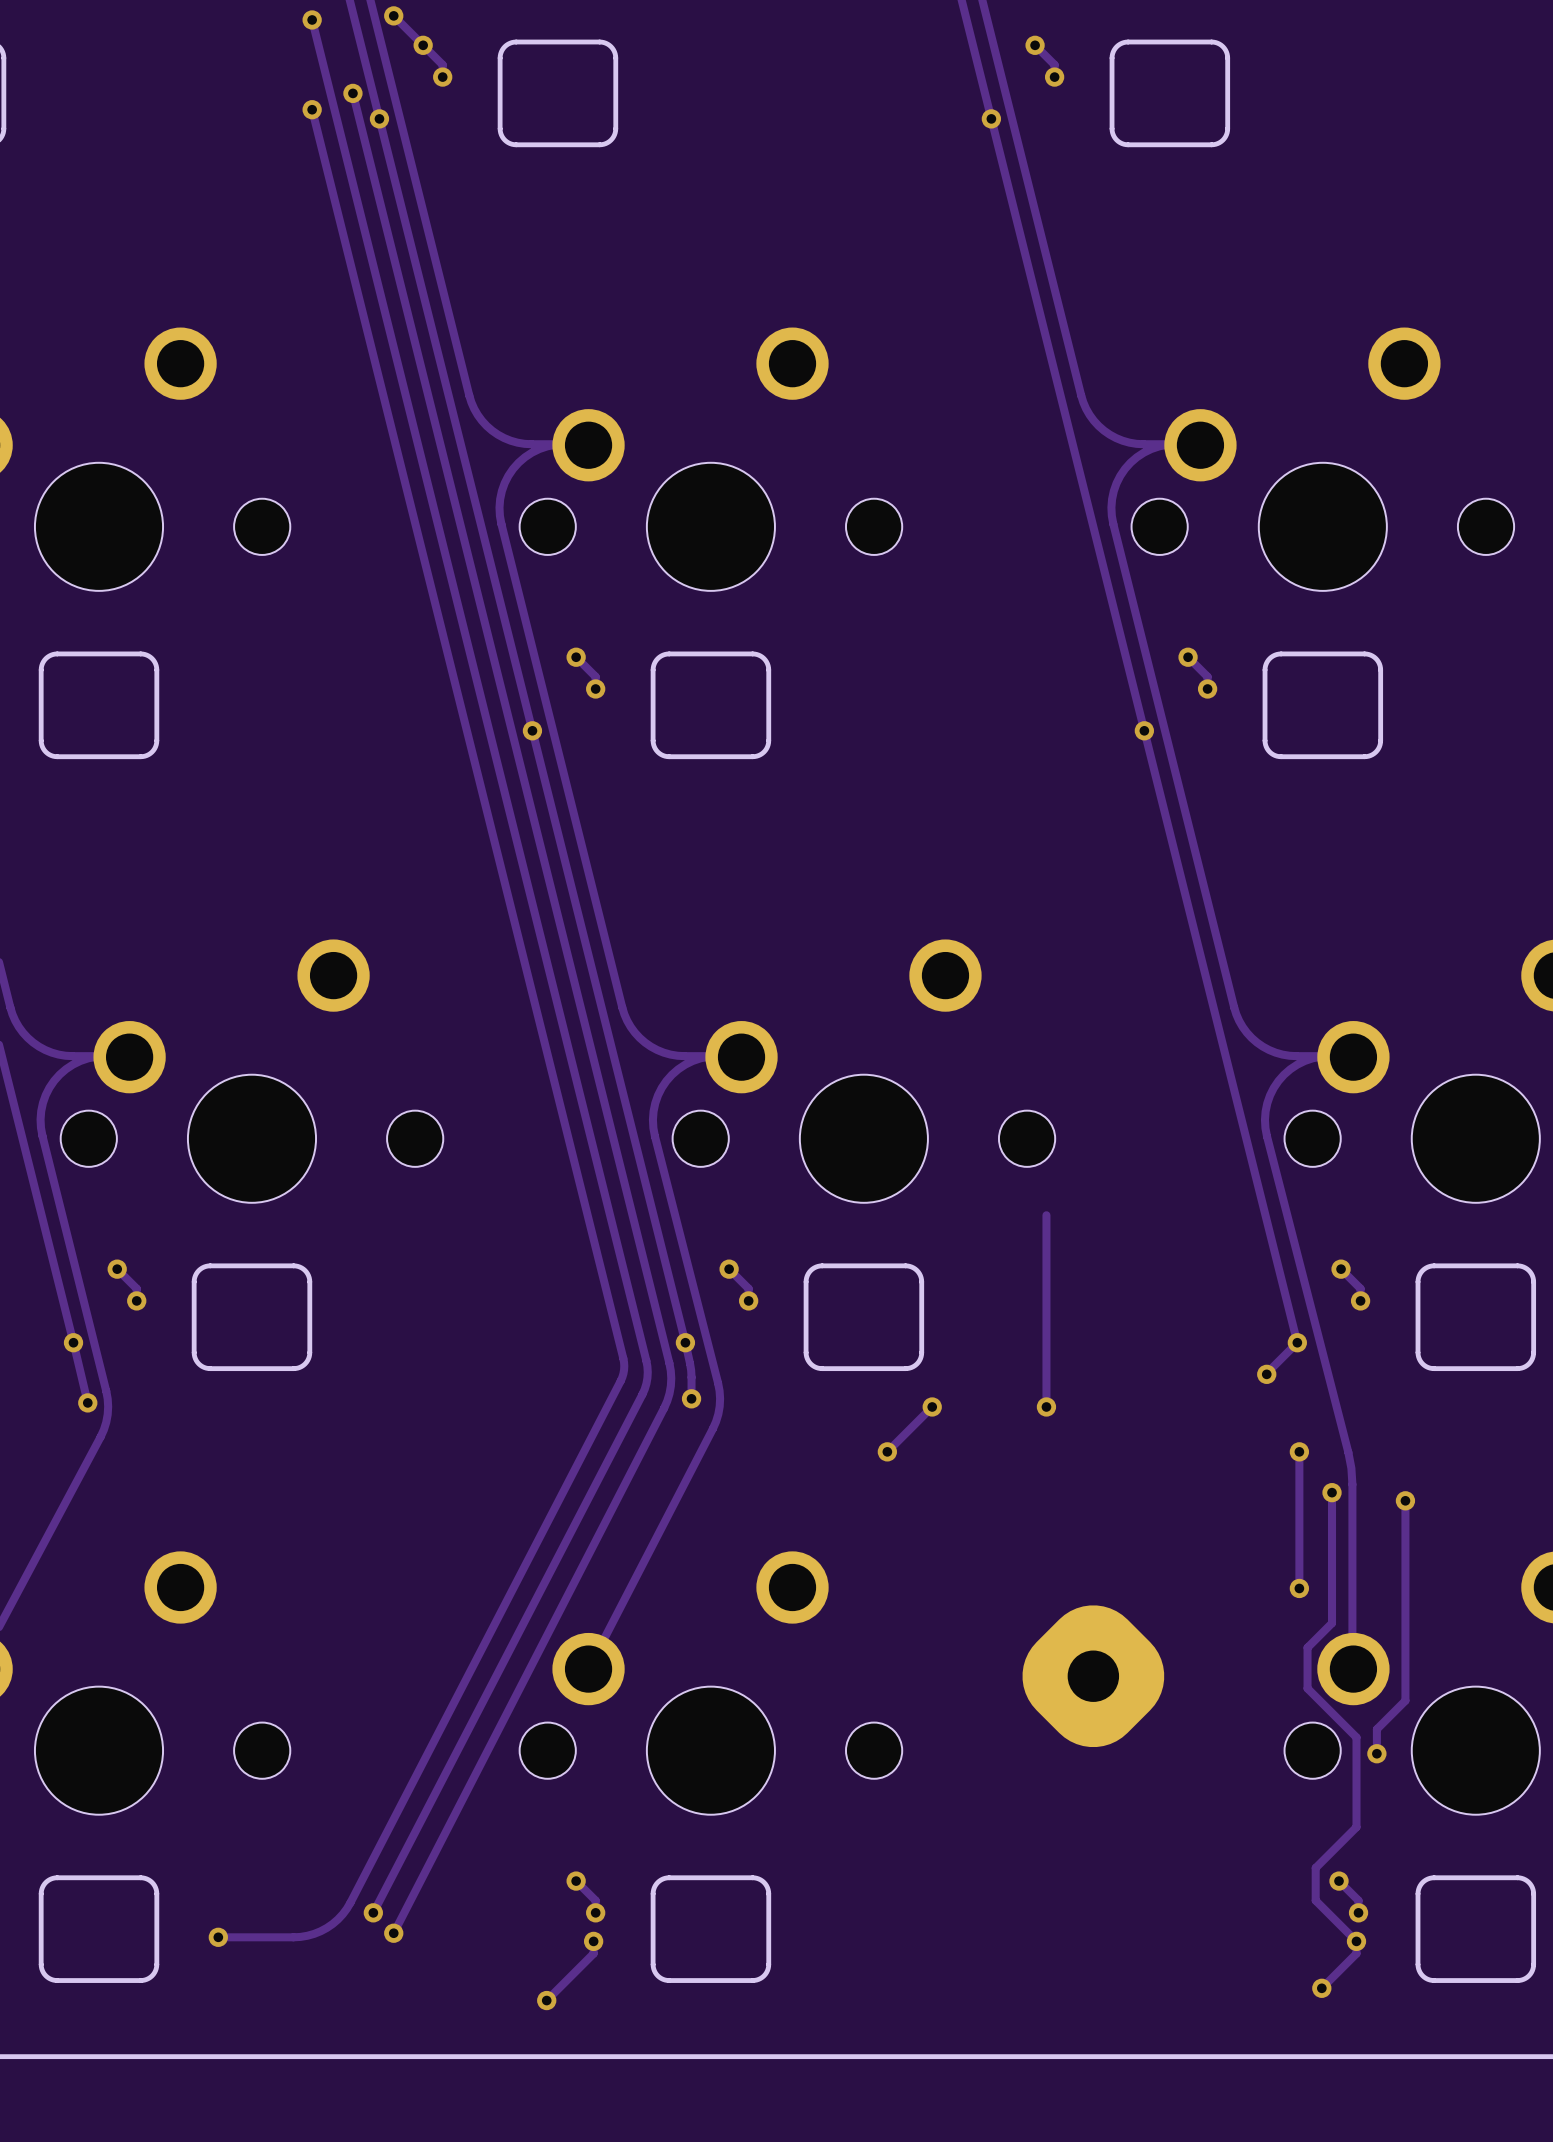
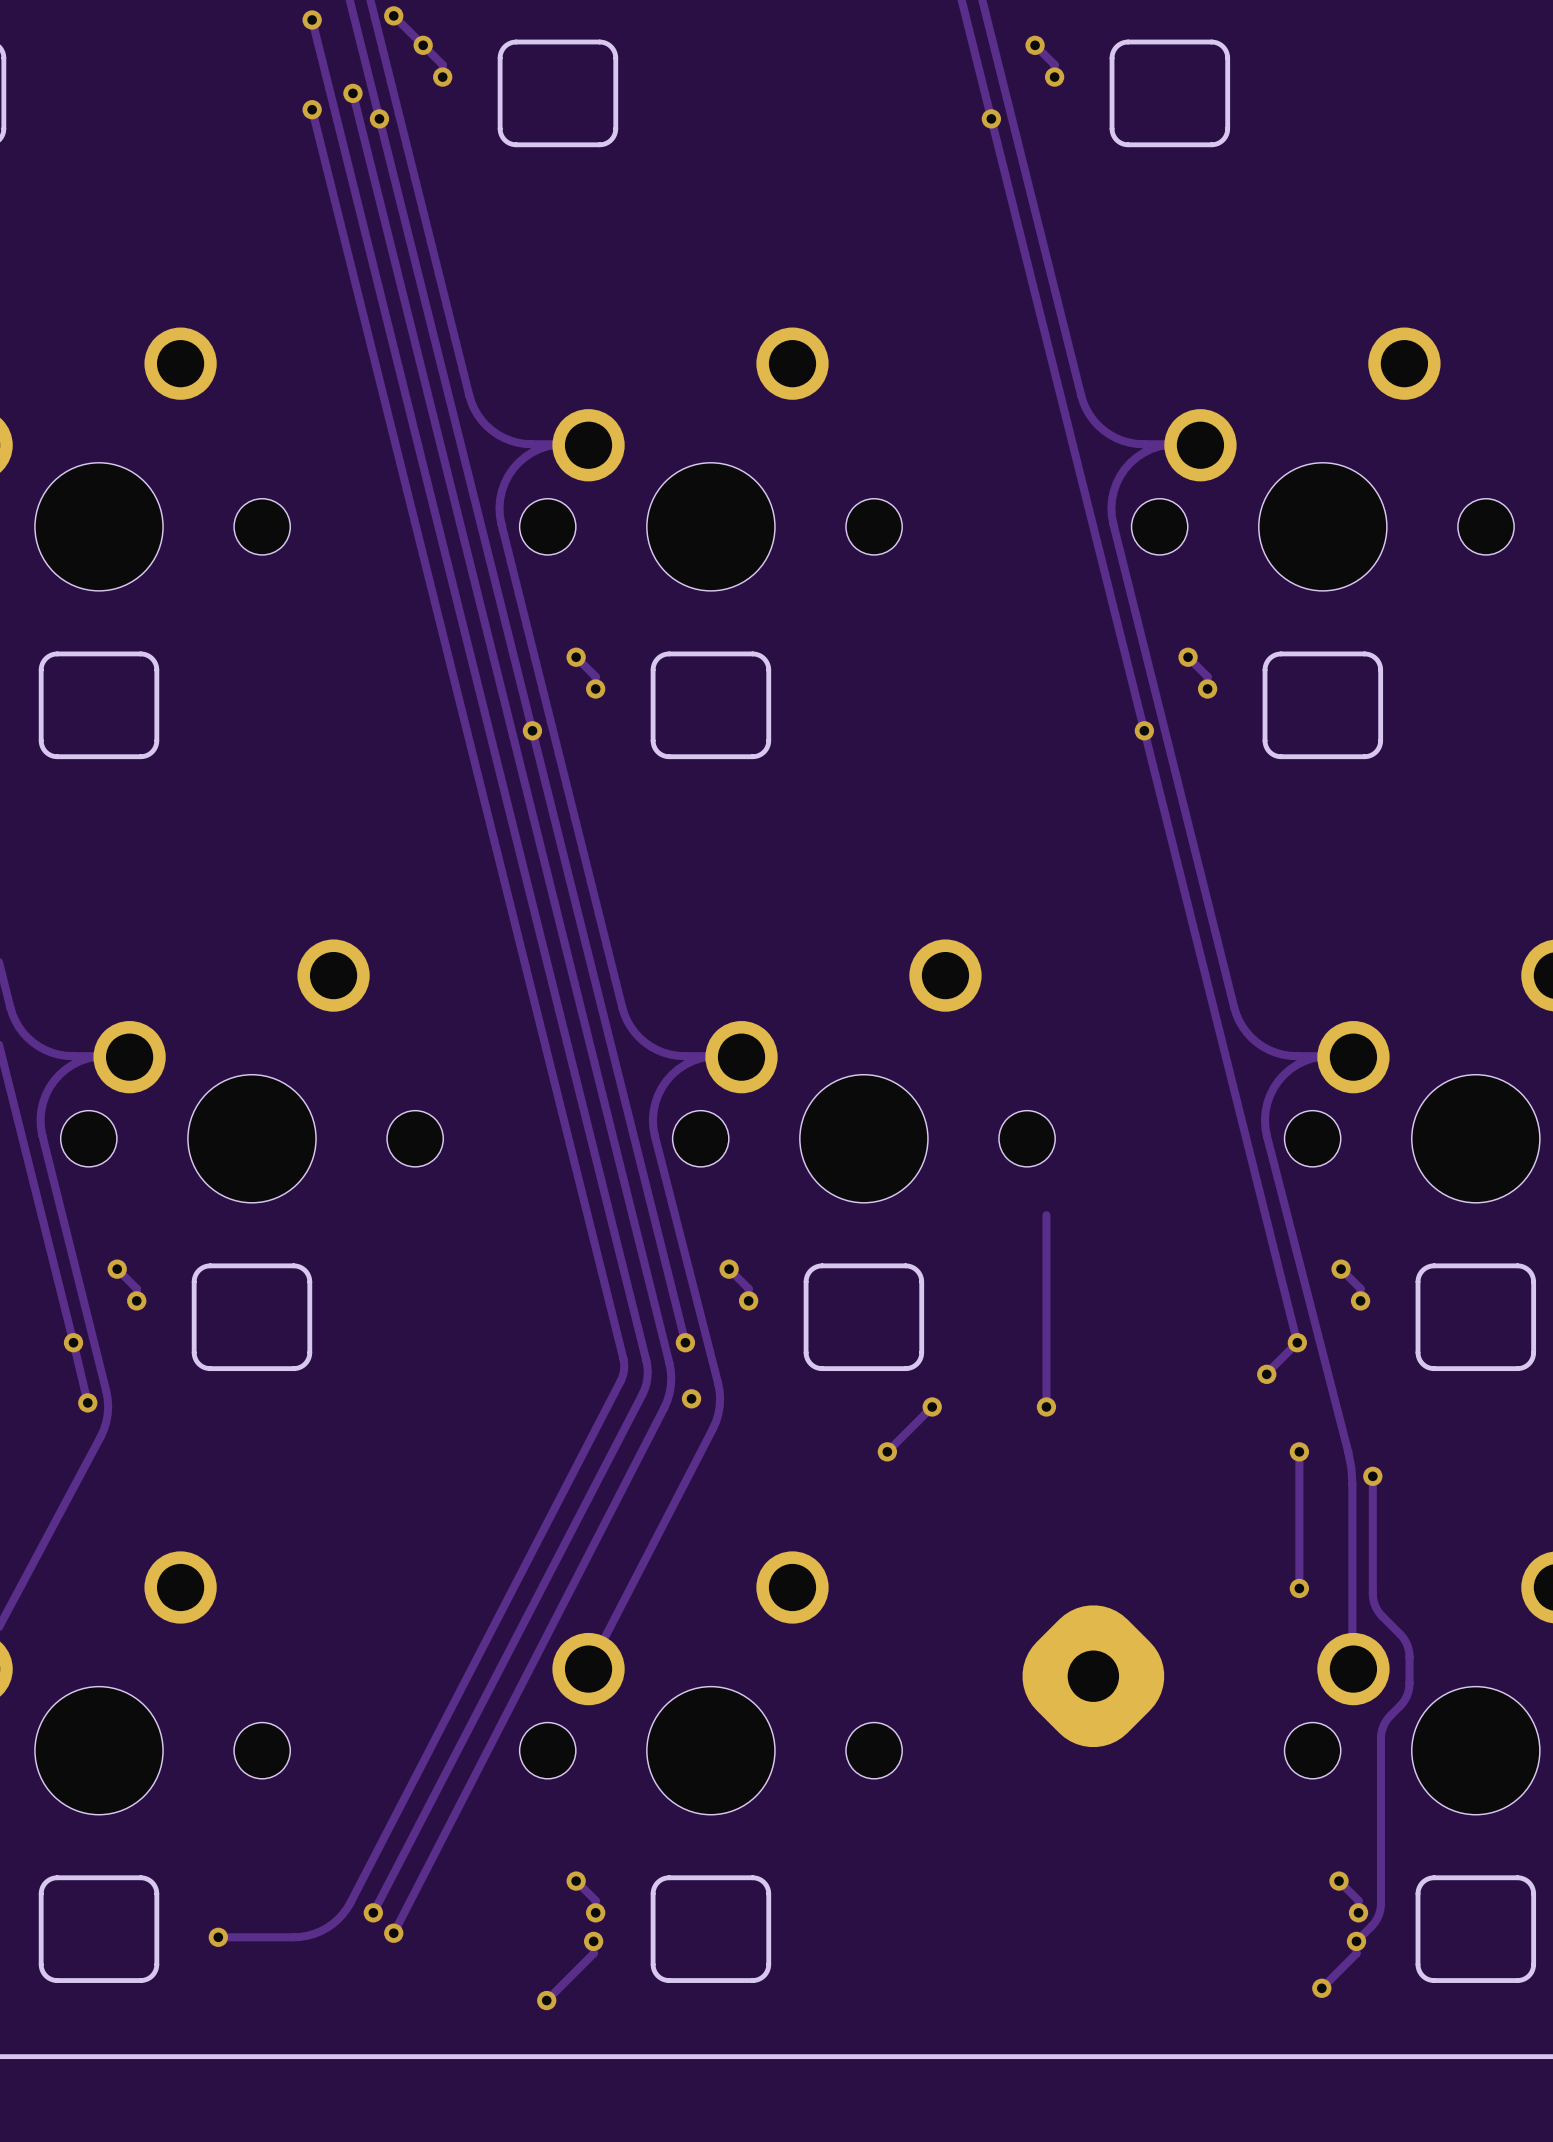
track: (685, 1342) (691, 1370) (691, 1398) -> none
via: none -> (1372, 1476)
track: (1332, 1492) (1332, 1623) (1307, 1647) (1307, 1688) (1356, 1737) (1356, 1827) (1315, 1867) (1315, 1900) (1356, 1941) -> none
via: (1332, 1492) -> none
track: (1405, 1500) (1405, 1700) (1400, 1706) -> (1372, 1476) (1373, 1599) (1380, 1613) (1404, 1639) (1409, 1653) (1409, 1687) (1407, 1695) (1400, 1706)
via: (1405, 1500) -> none
track: (1390, 1715) (1376, 1729) (1376, 1753) -> (1390, 1715) (1383, 1726) (1381, 1735) (1380, 1909) (1373, 1923) (1356, 1941)
via: (1376, 1753) -> none

